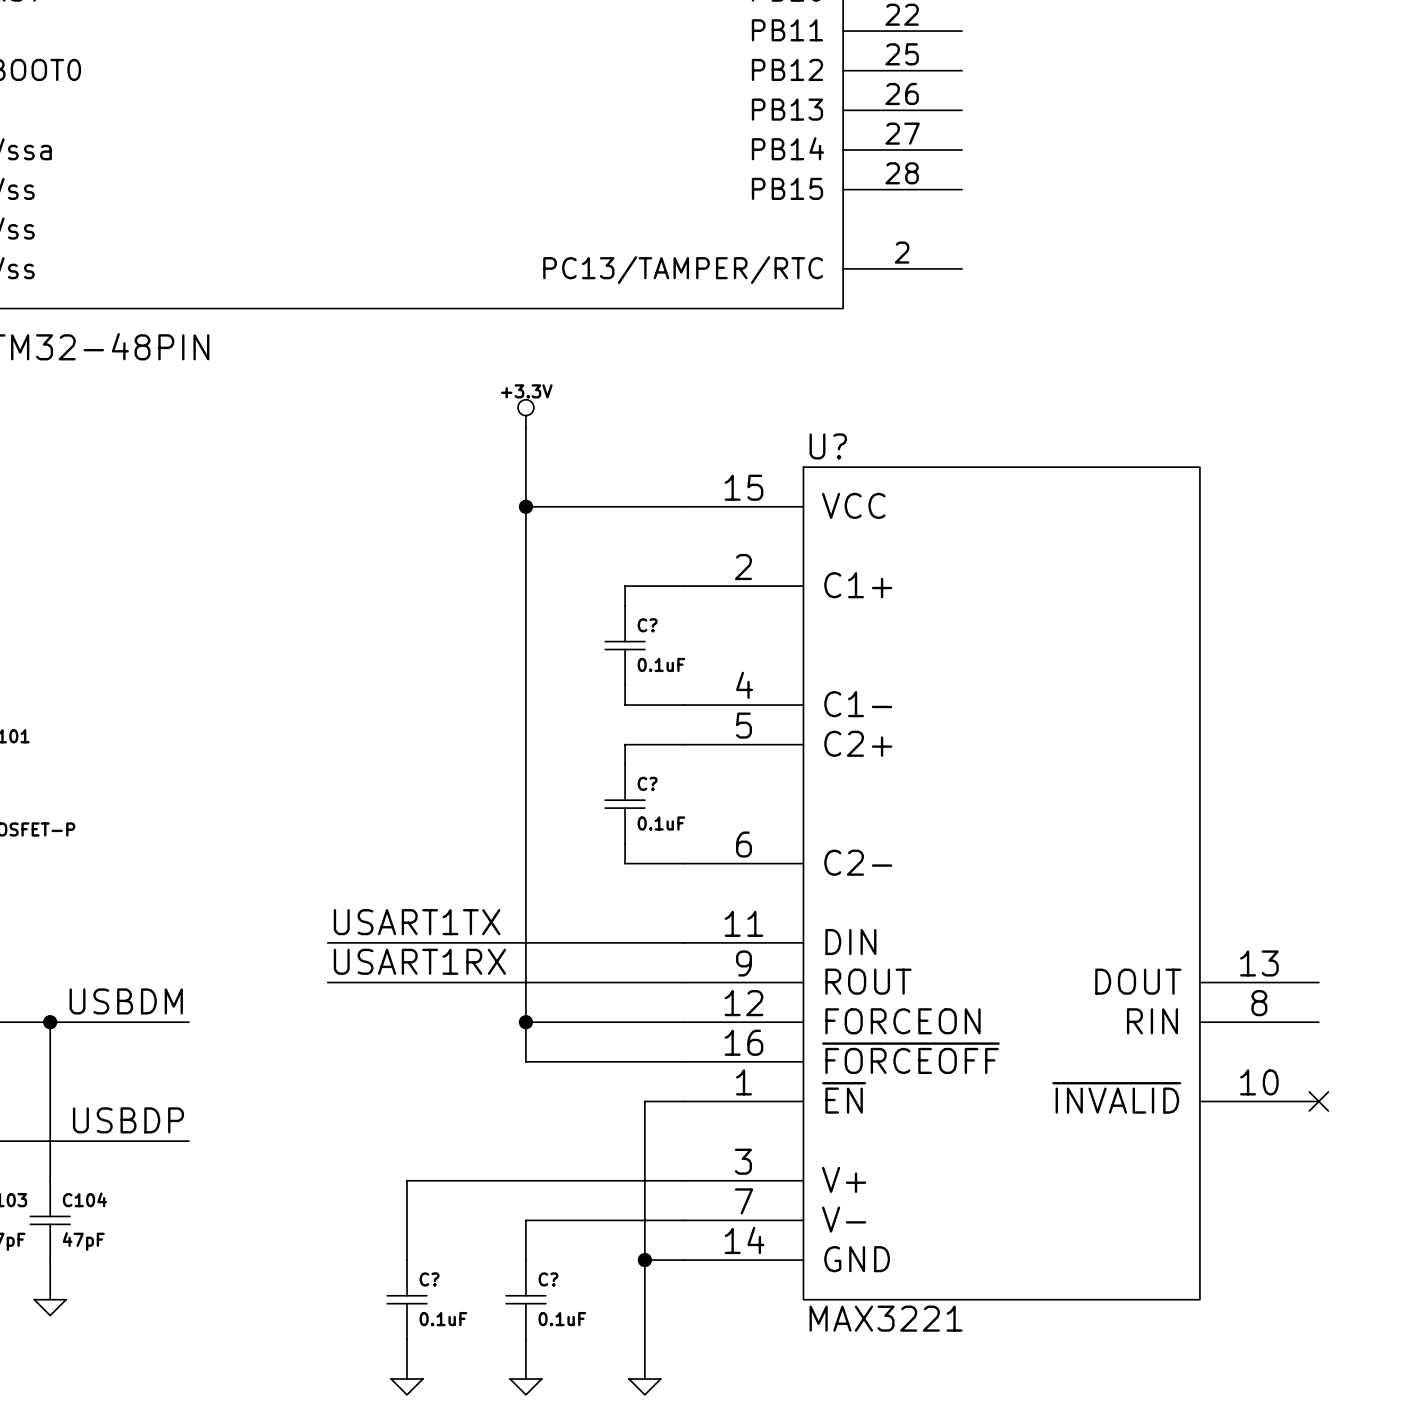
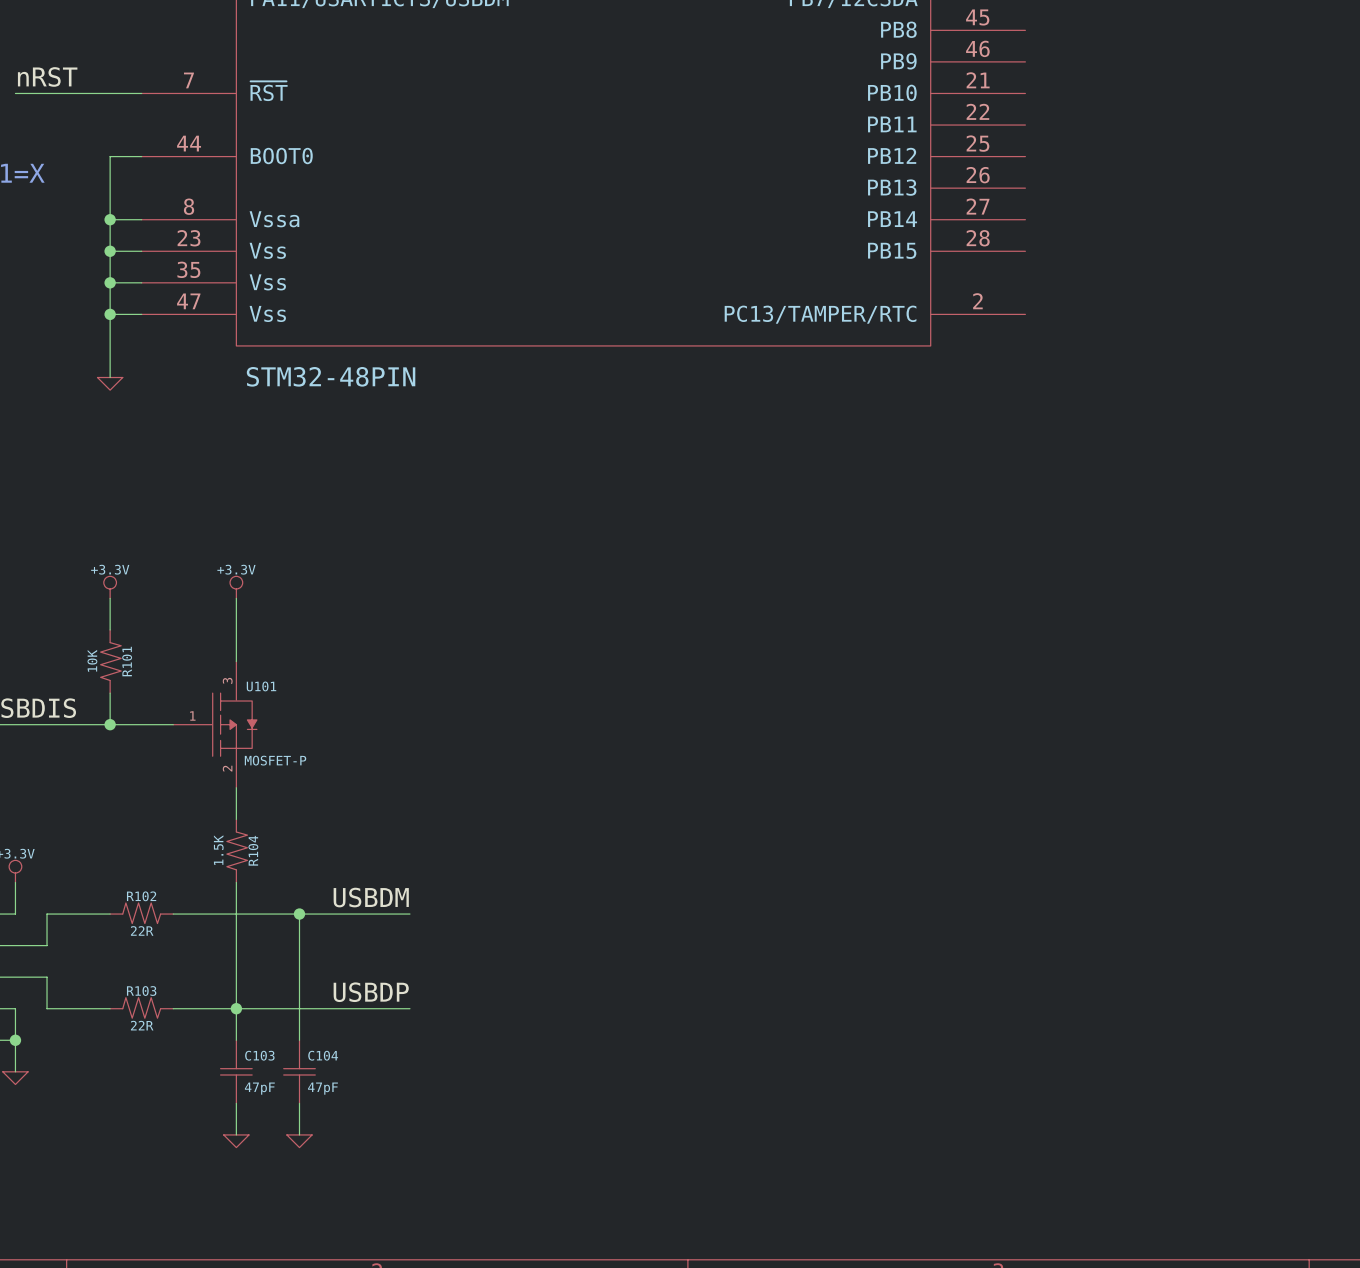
power symbol: +3.3V (525, 413) -> none
wire: (525, 427) (525, 1061) (684, 1061) -> none
wire: (525, 506) (684, 506) -> none
junction: (525, 506) -> none
wire: (684, 586) (625, 586) (625, 605) -> none
C?: 0.1uF (625, 645) -> none
wire: (625, 685) (625, 705) (684, 705) -> none
wire: (684, 744) (625, 744) (625, 764) -> none
C?: 0.1uF (625, 804) -> none
wire: (625, 843) (625, 863) (684, 863) -> none
U?: MAX3221 (1001, 883) -> none
label: USART1TX (417, 922) -> none
wire: (327, 942) (684, 942) -> none
label: USART1RX (419, 961) -> none
wire: (327, 982) (684, 982) -> none
wire: (525, 1022) (684, 1022) -> none
junction: (525, 1022) -> none
wire: (684, 1101) (644, 1101) (644, 1379) -> none
no-connect mark: (1318, 1101) -> none
wire: (684, 1180) (407, 1180) (407, 1260) -> none
wire: (684, 1220) (525, 1220) (525, 1260) -> none
wire: (644, 1260) (684, 1260) -> none
junction: (644, 1260) -> none
C?: 0.1uF (407, 1299) -> none
C?: 0.1uF (525, 1299) -> none
wire: (407, 1339) (407, 1379) -> none
wire: (525, 1339) (525, 1379) -> none
power symbol: (407, 1386) -> none
power symbol: (525, 1386) -> none
power symbol: (644, 1386) -> none

